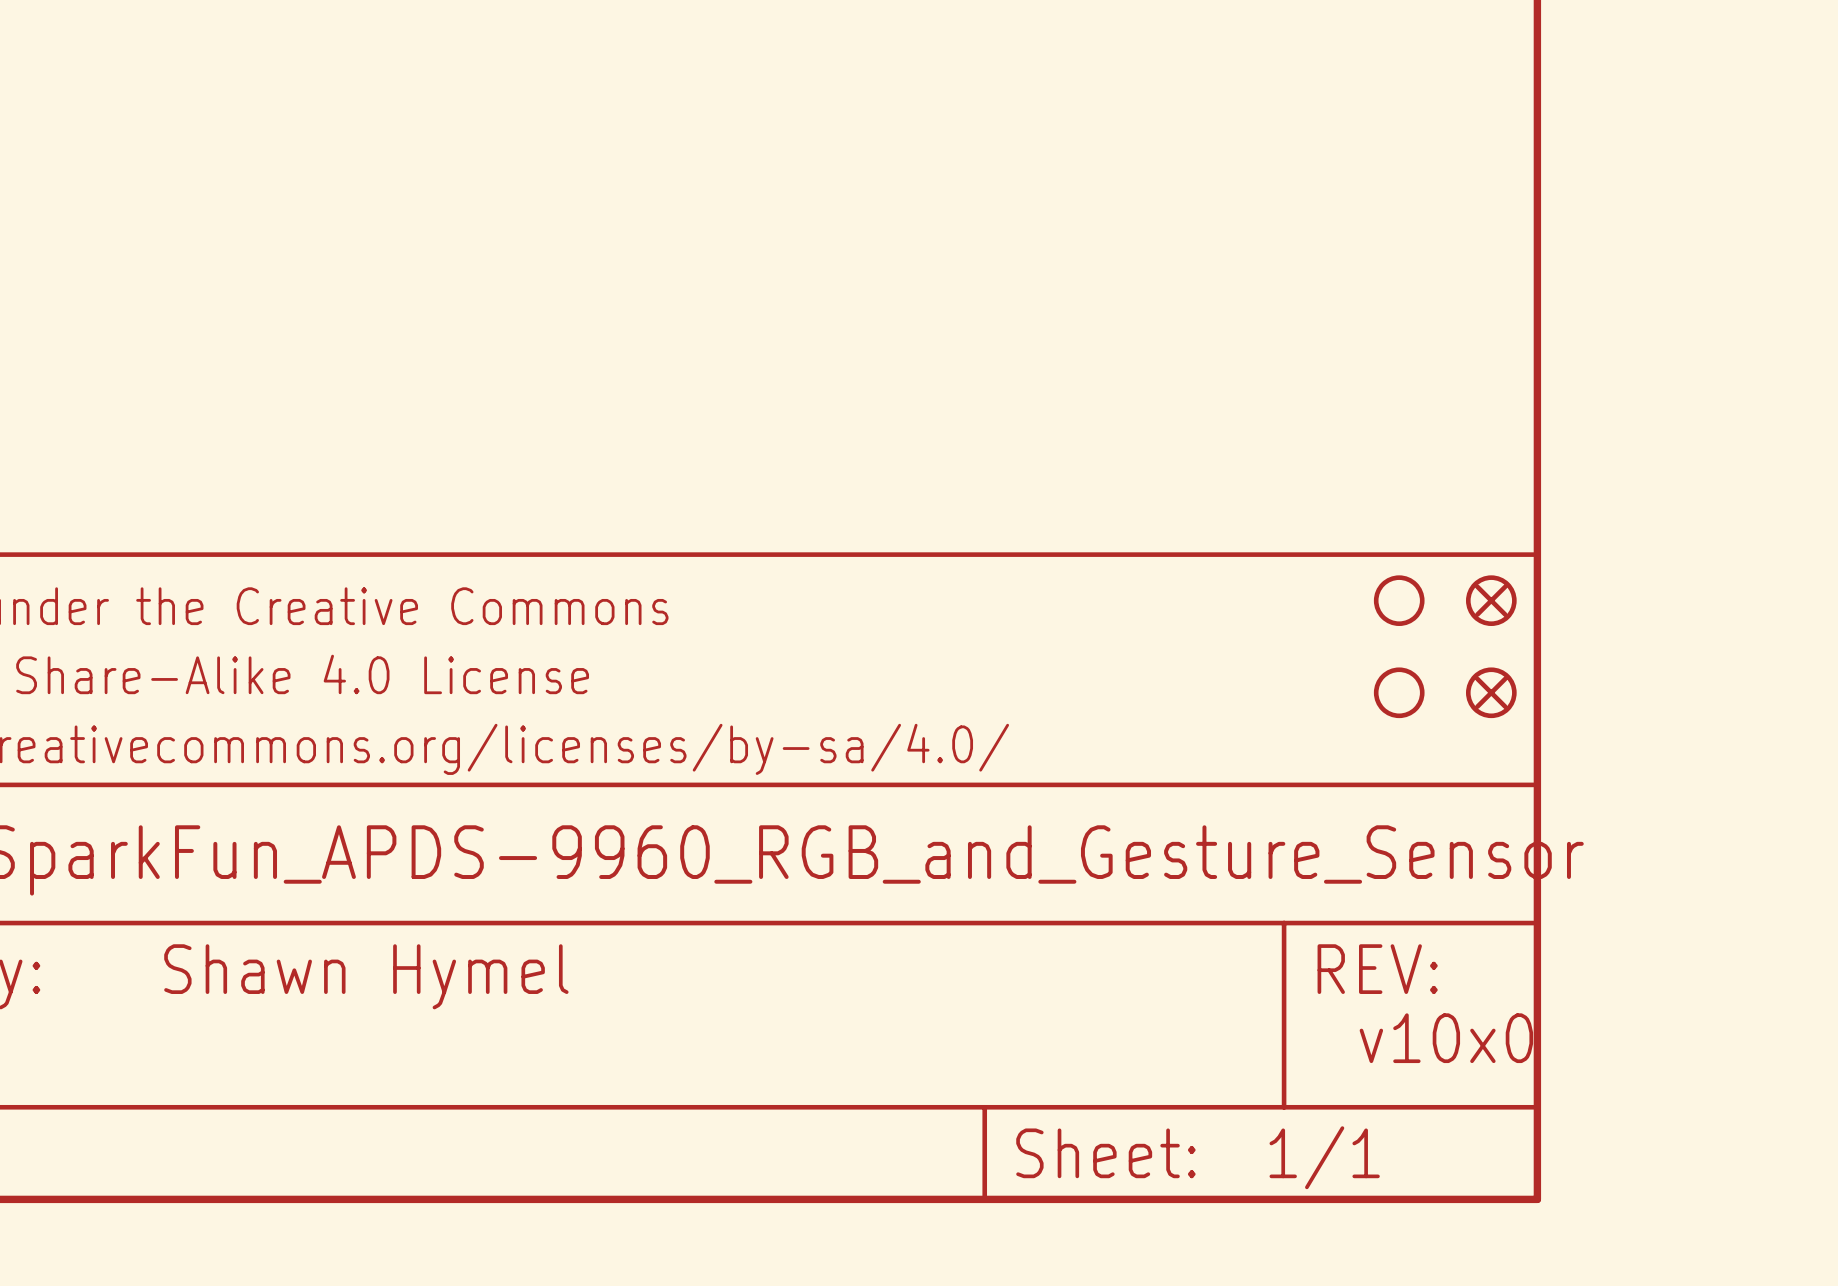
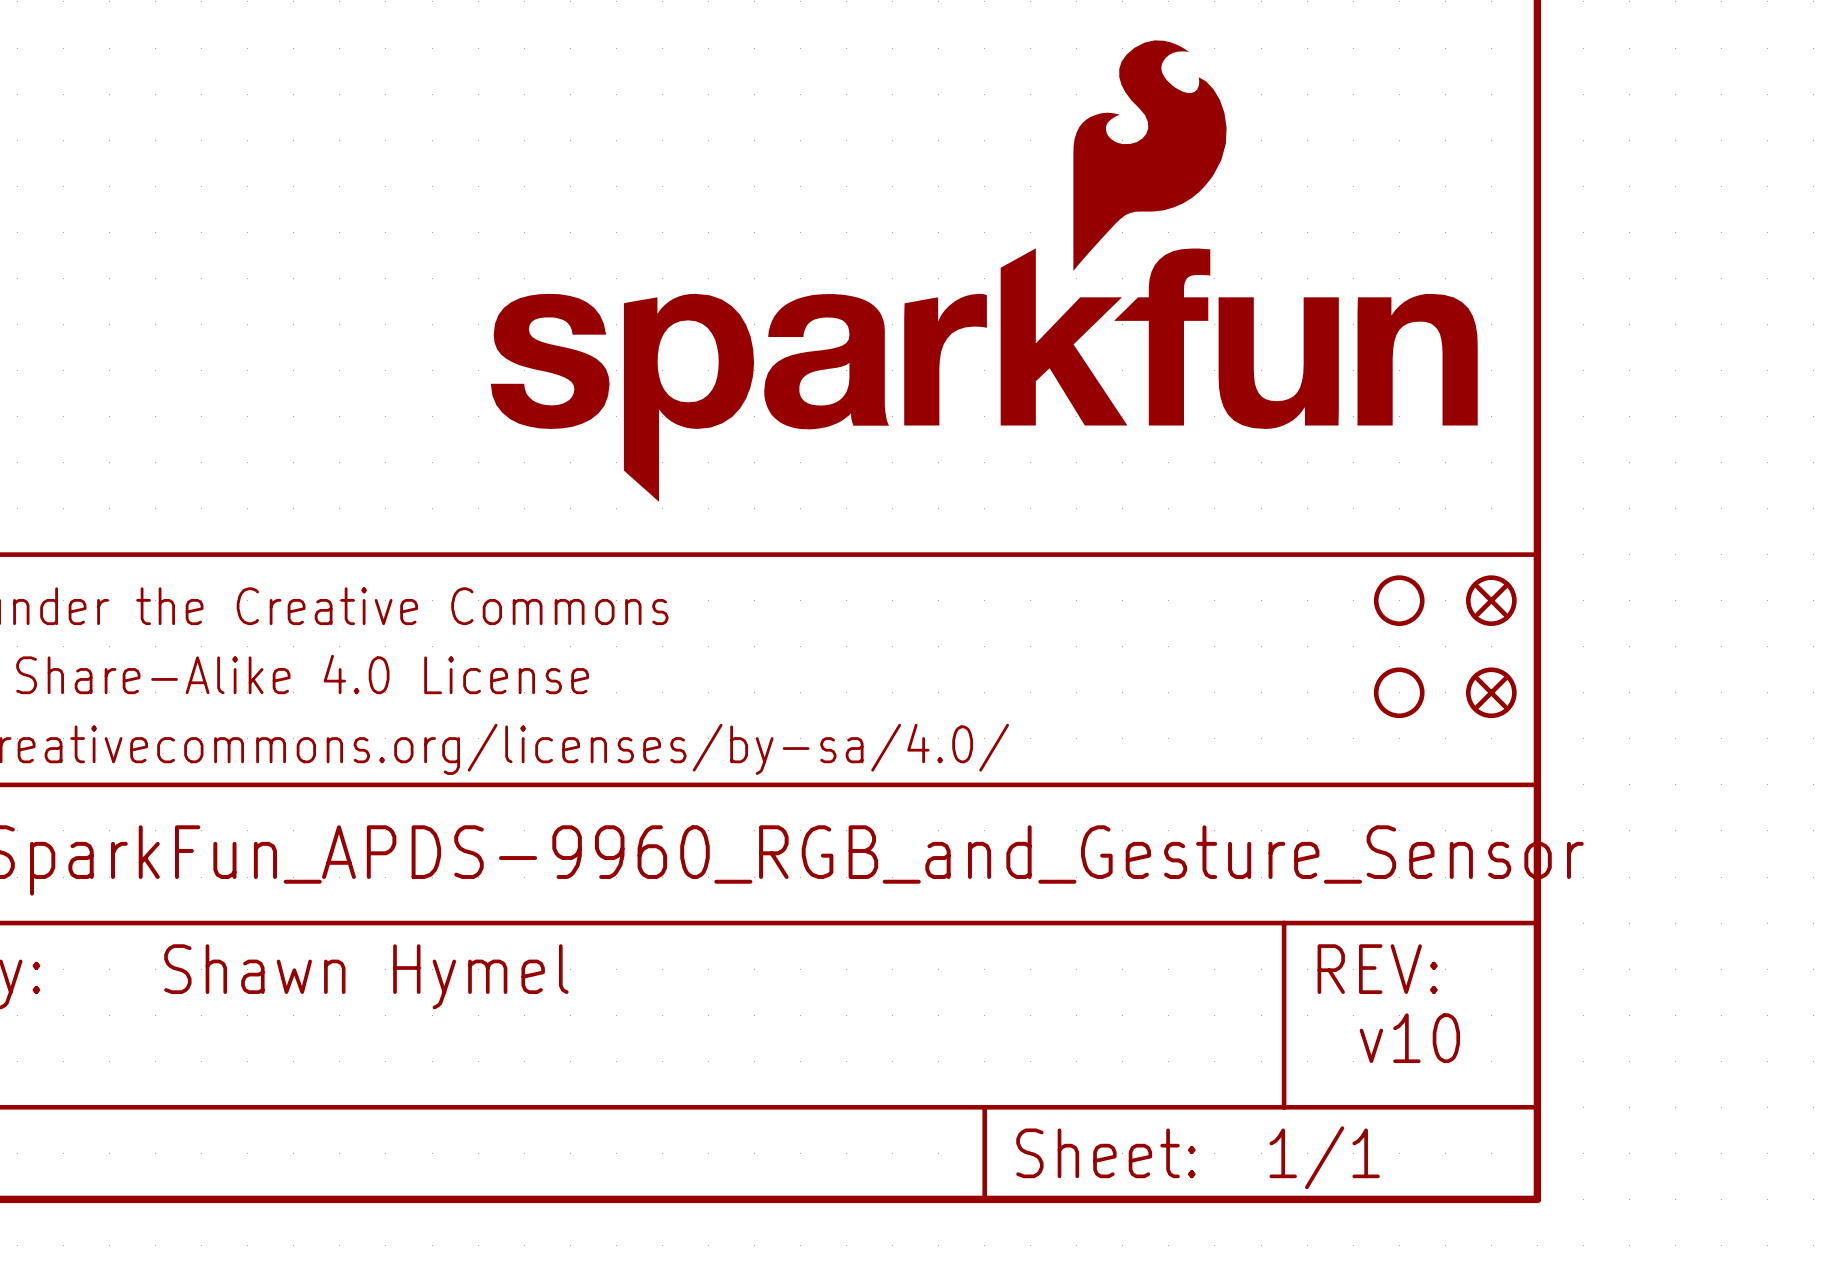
part: none -> (984, 271)
text: v10x0 (1446, 1038) -> v10 (1409, 1038)

